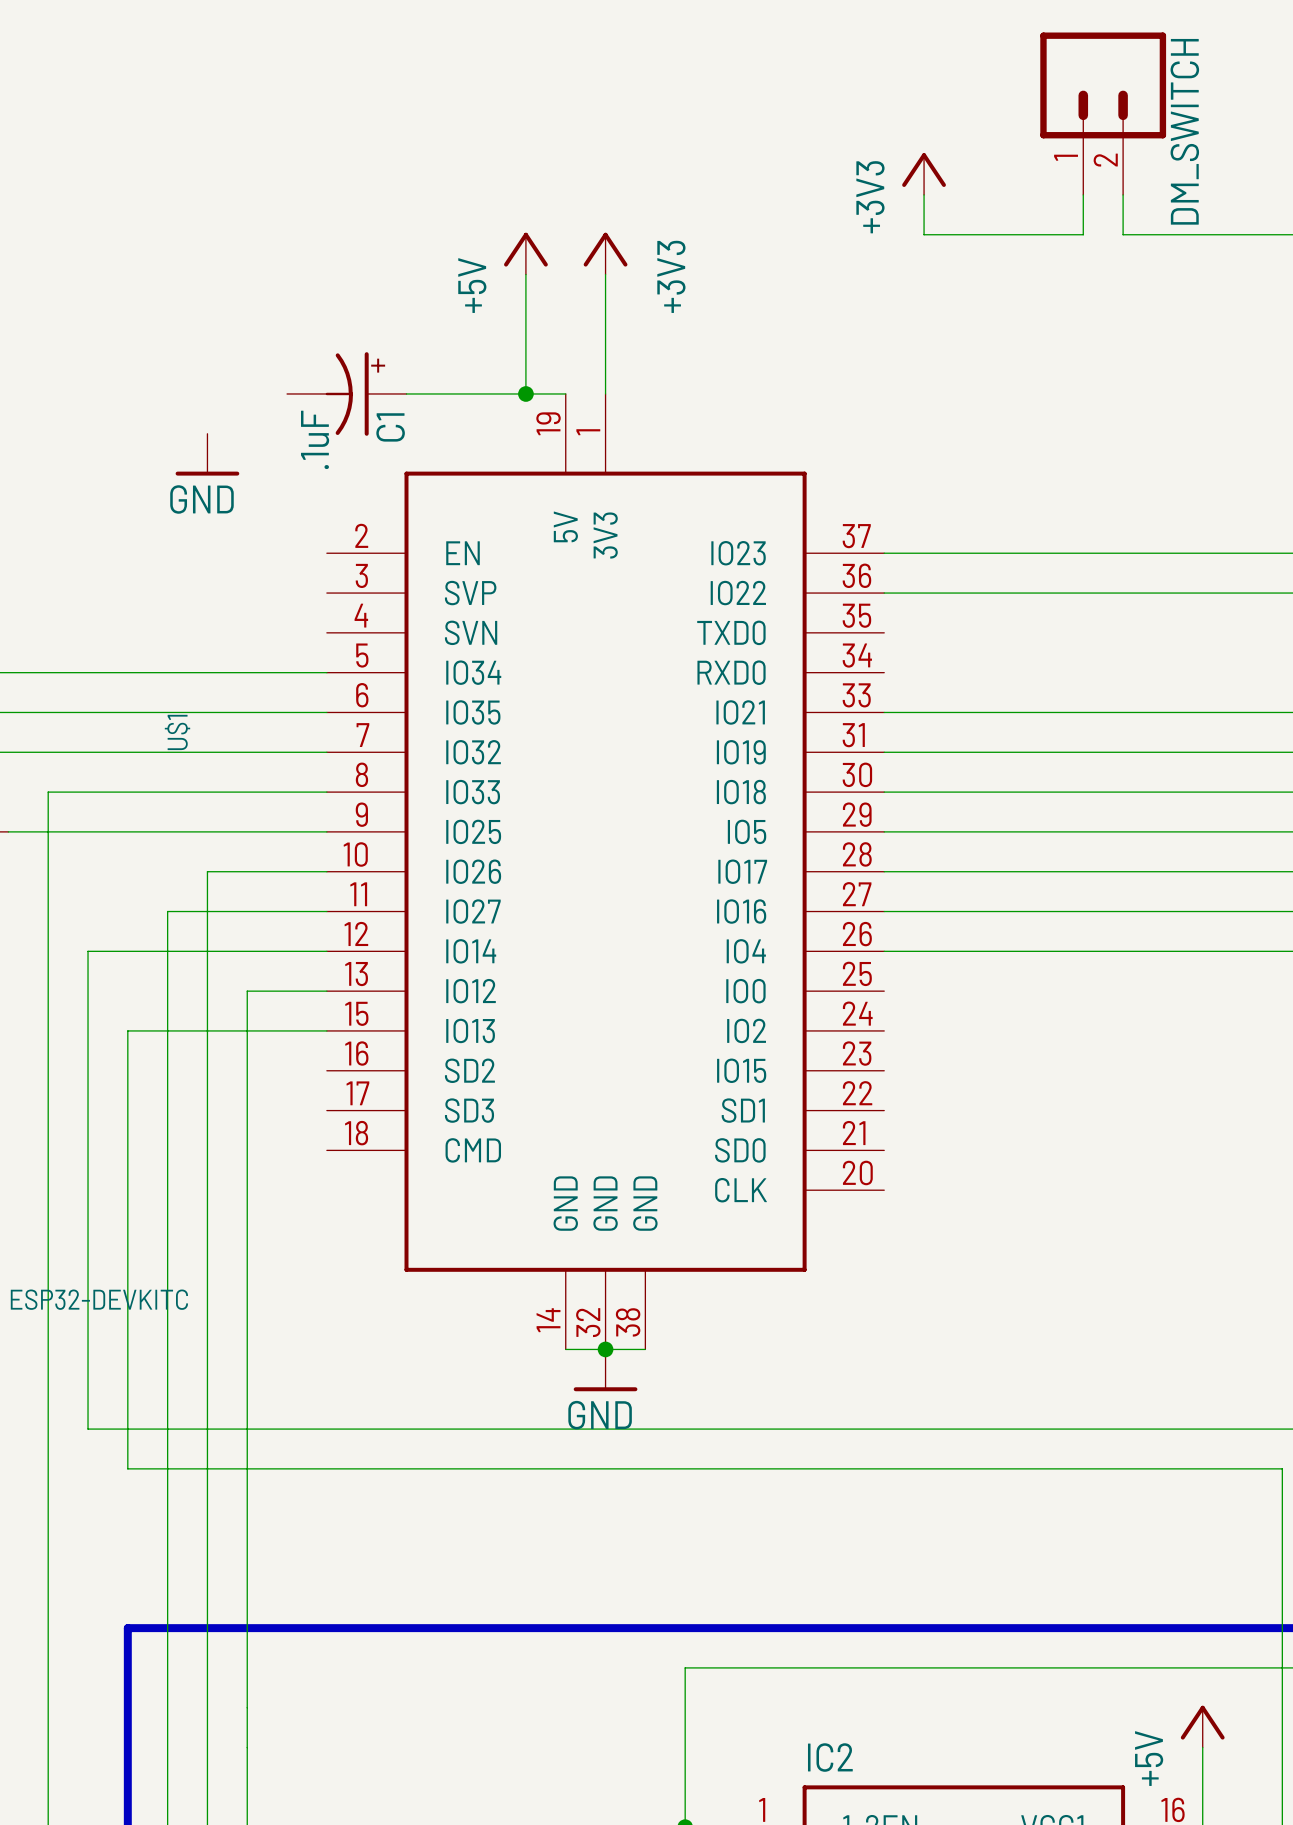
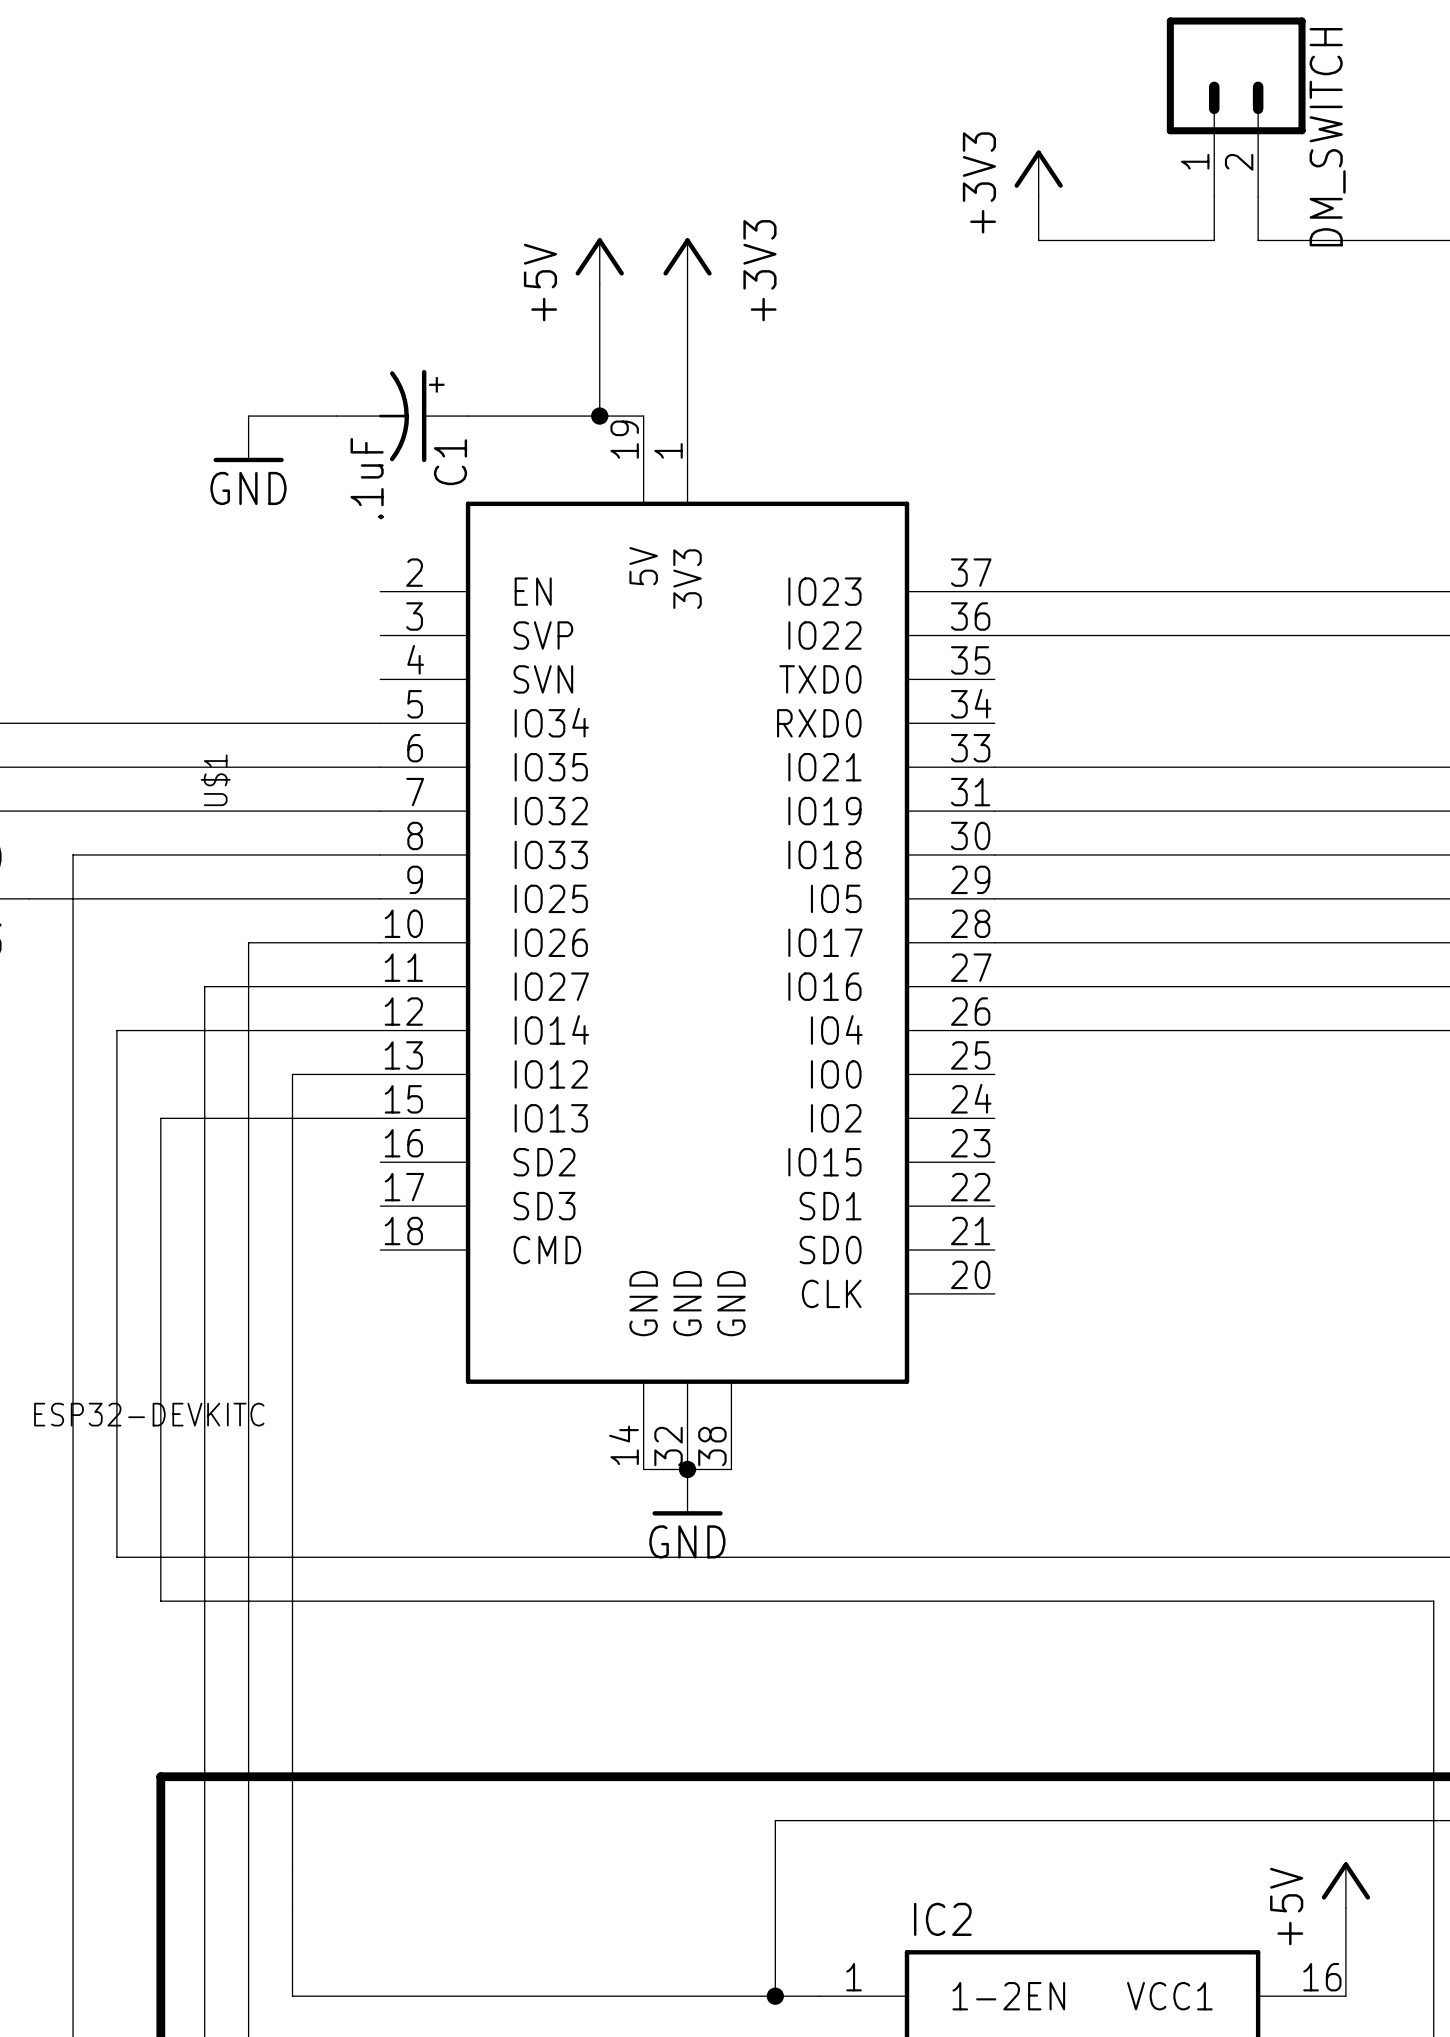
wire: none -> (248, 416) (336, 416)
power symbol position: GND (207, 454) -> GND (248, 439)

